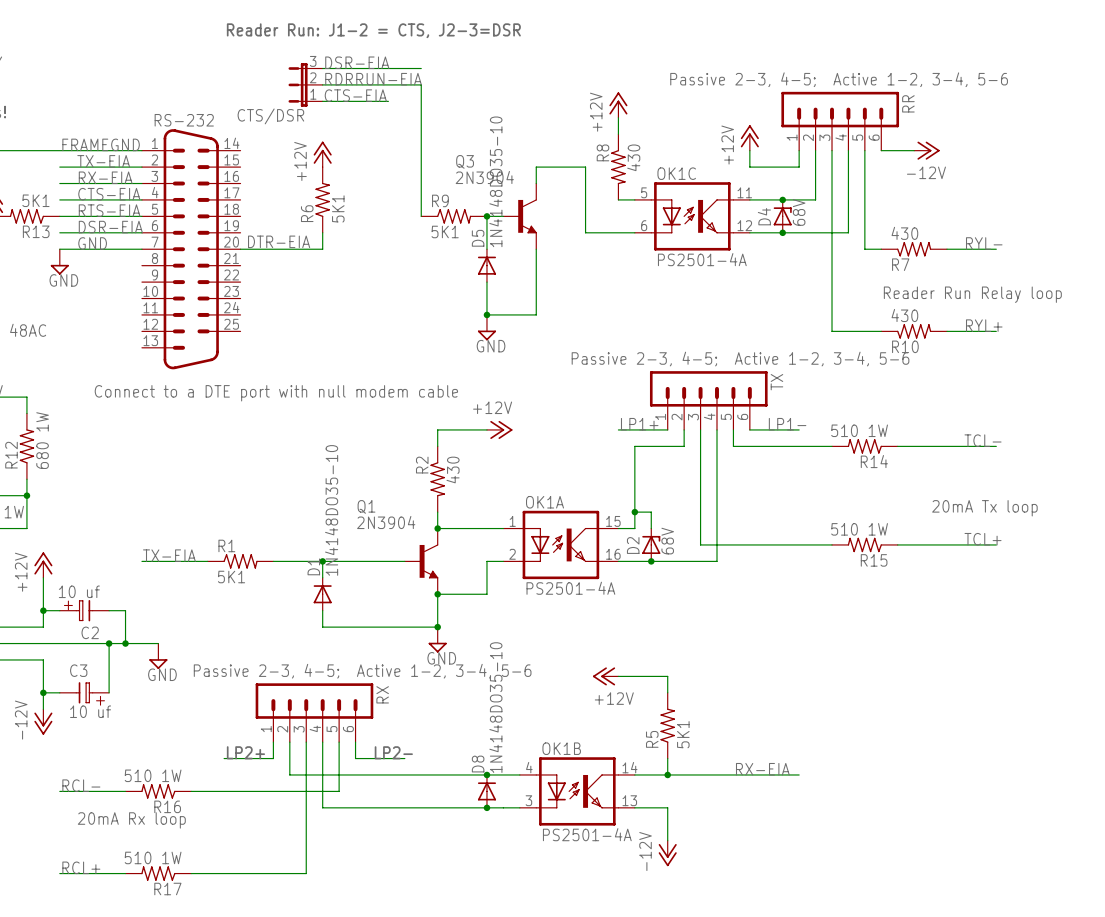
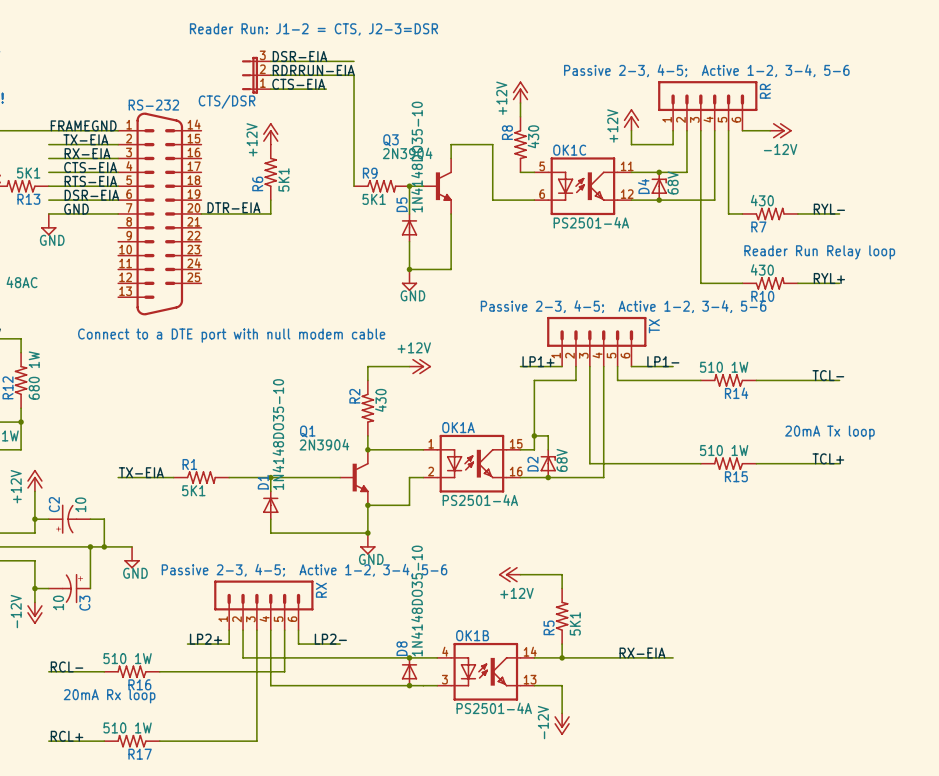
C2 value: 10 uf (79, 591) -> 10 (80, 504)
C2 symbol: [59, 600, 110, 622] -> [48, 504, 91, 534]
C2 name position: C2 (90, 632) -> C2 (54, 504)
C3 name position: C3 (78, 670) -> C3 (84, 603)
C3 symbol: [59, 682, 110, 704] -> [48, 573, 91, 604]
C3 value: 10 uf (90, 711) -> 10 (58, 602)

